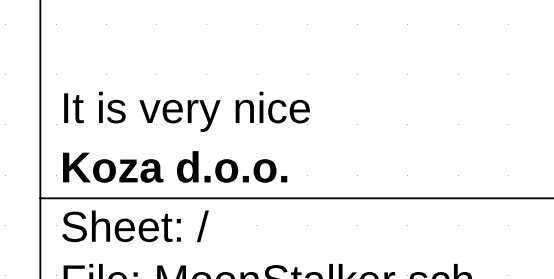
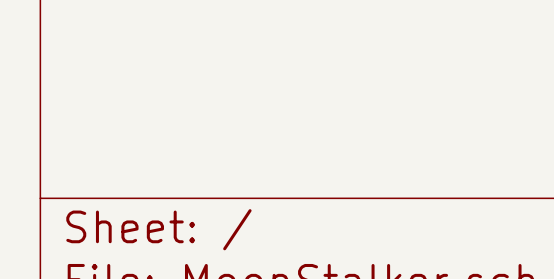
title block: It is very nice (187, 111) -> none
title block: Koza d.o.o. (175, 166) -> none

